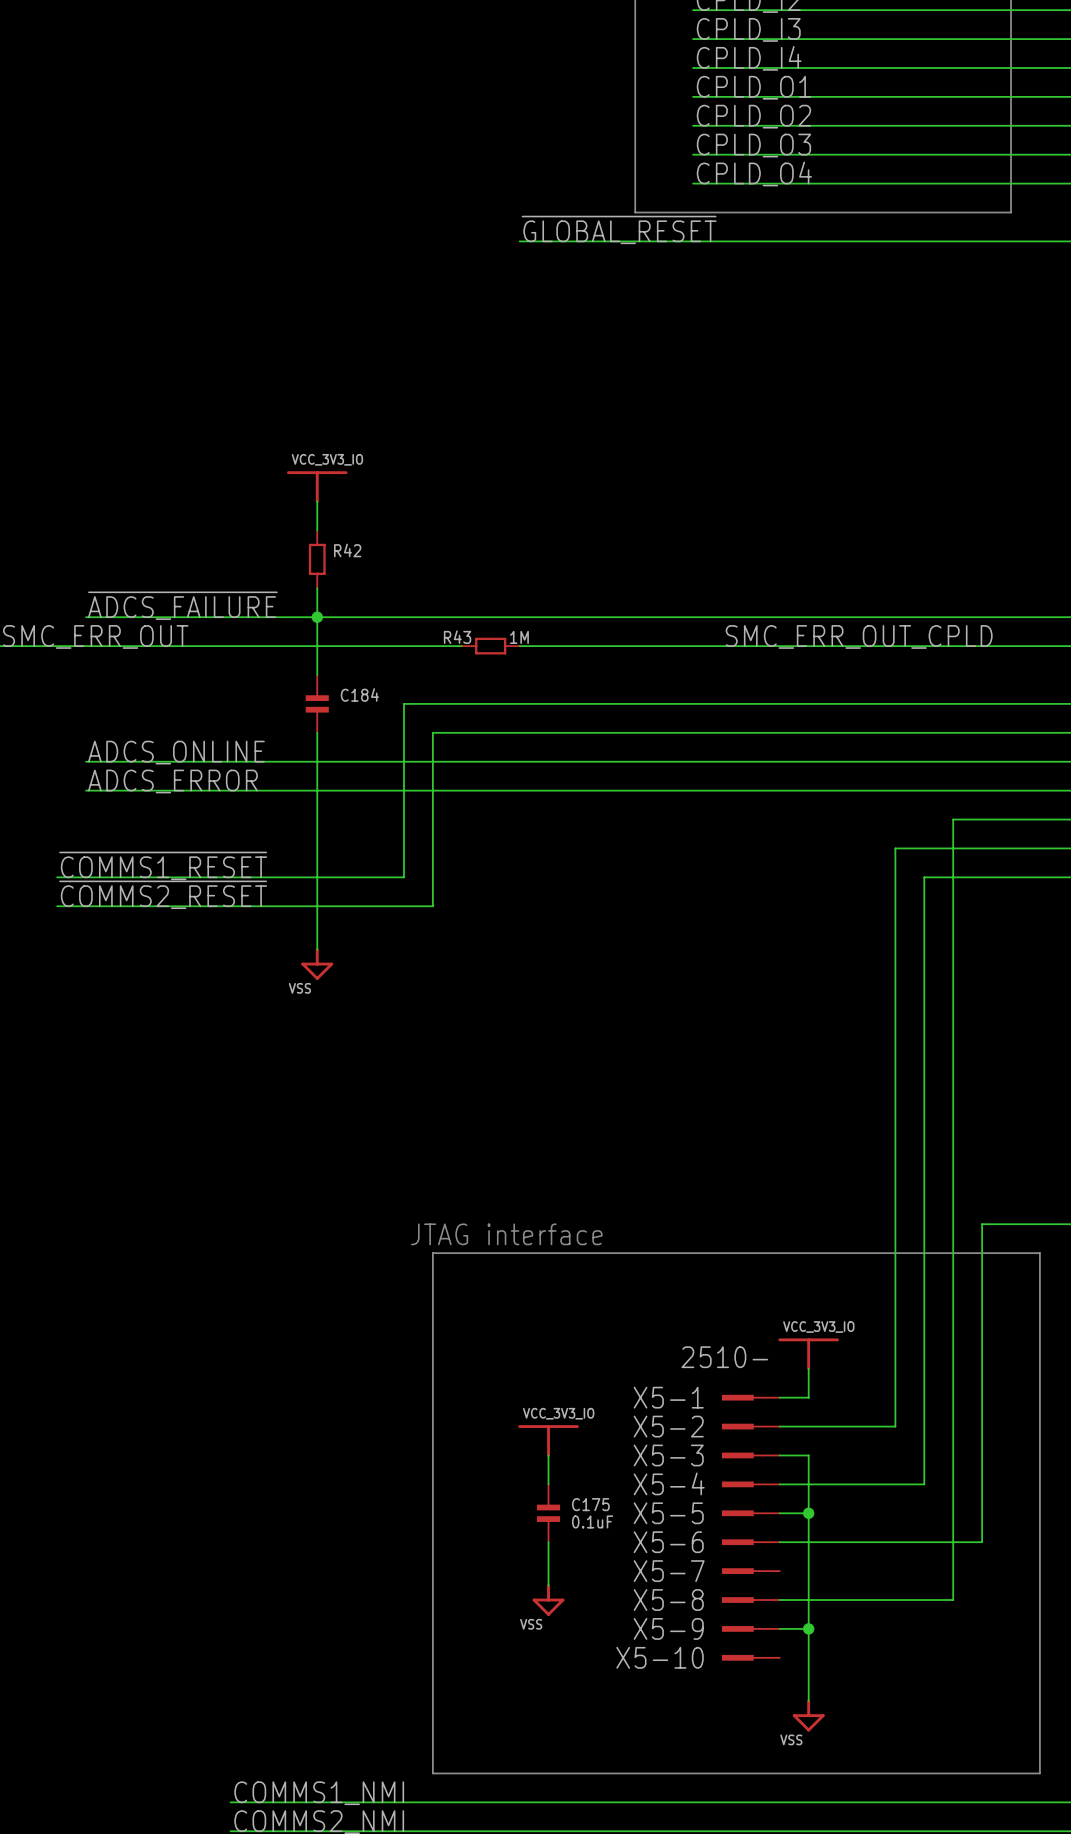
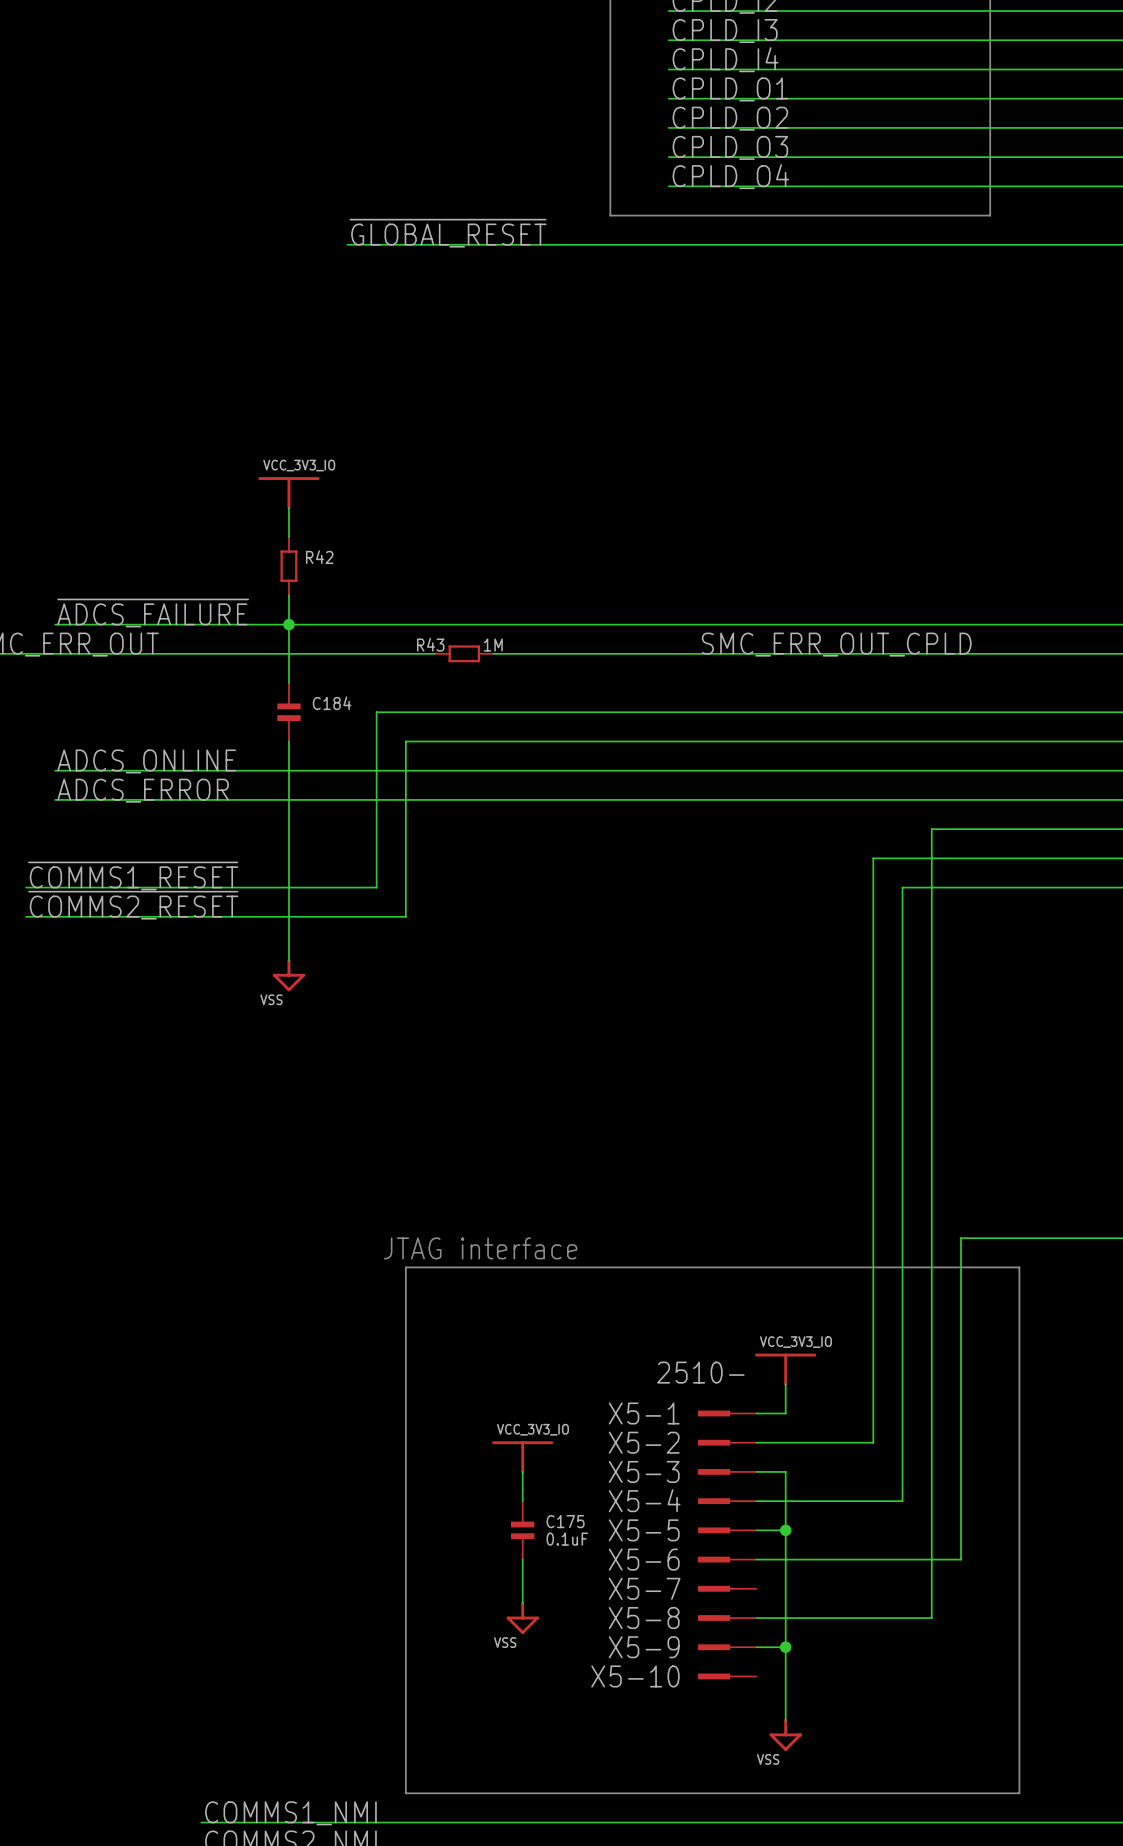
label position: ~{GLOBAL_RESET} (619, 229) -> ~{GLOBAL_RESET} (448, 233)
wire: none -> (347, 244) (493, 244)

